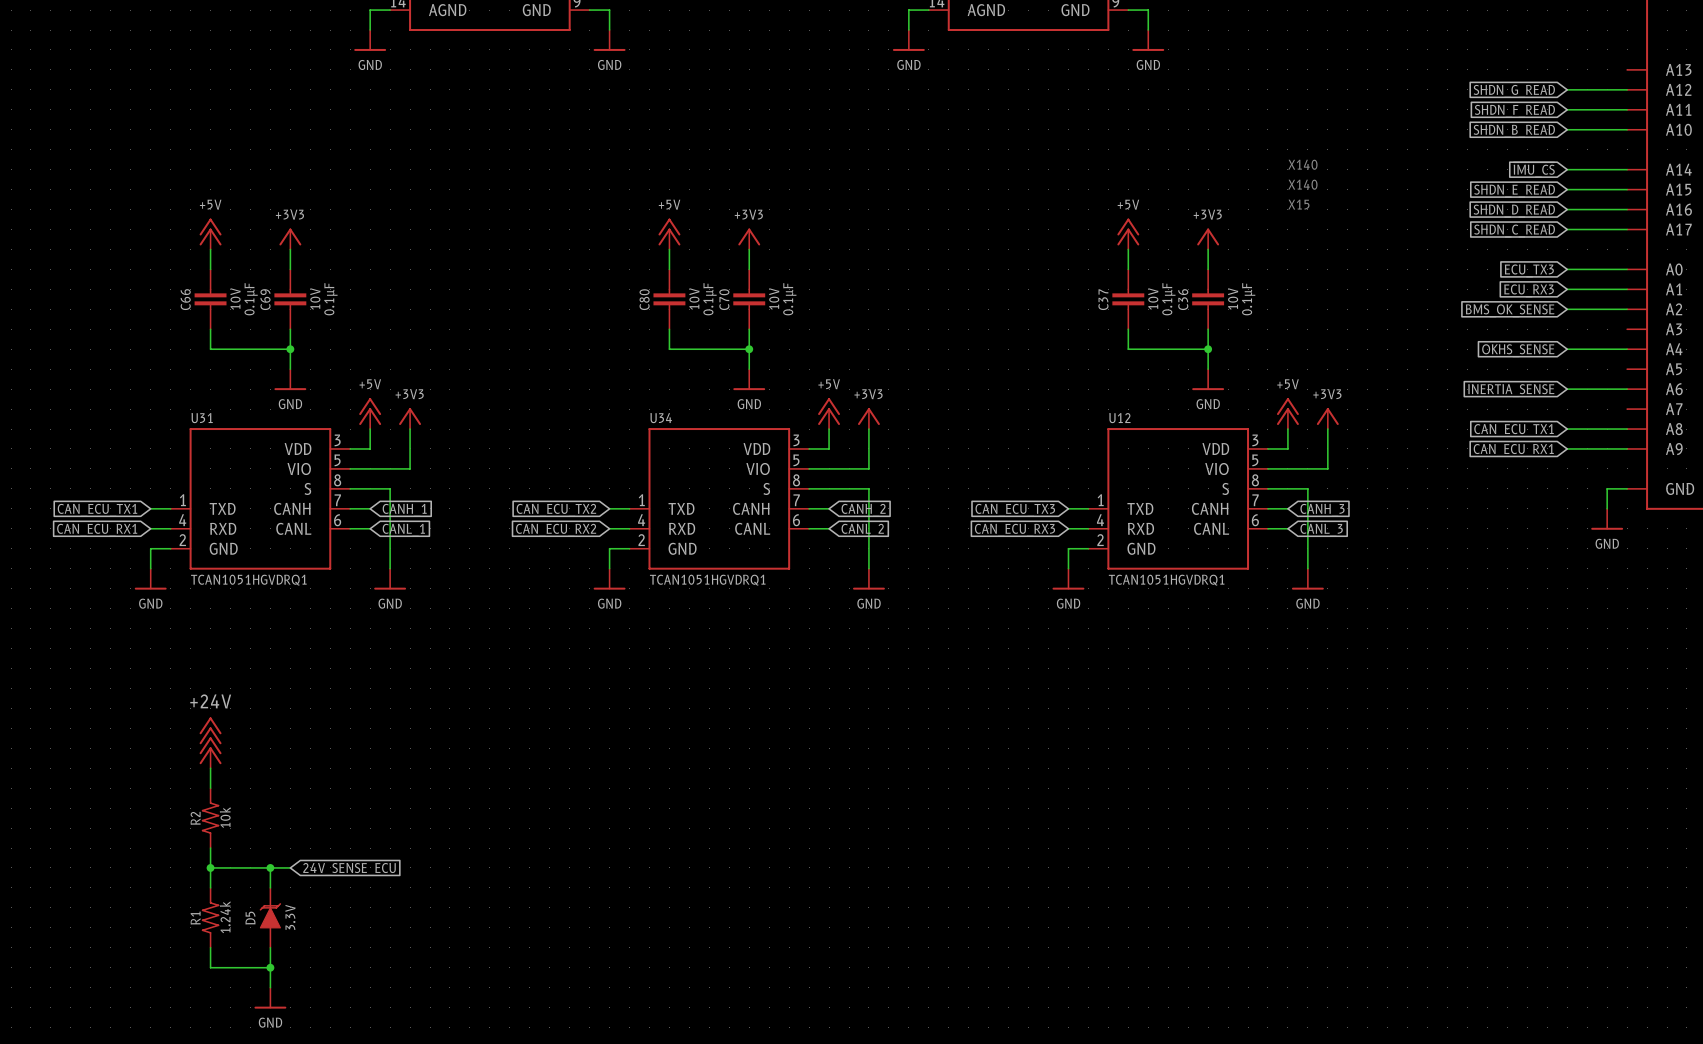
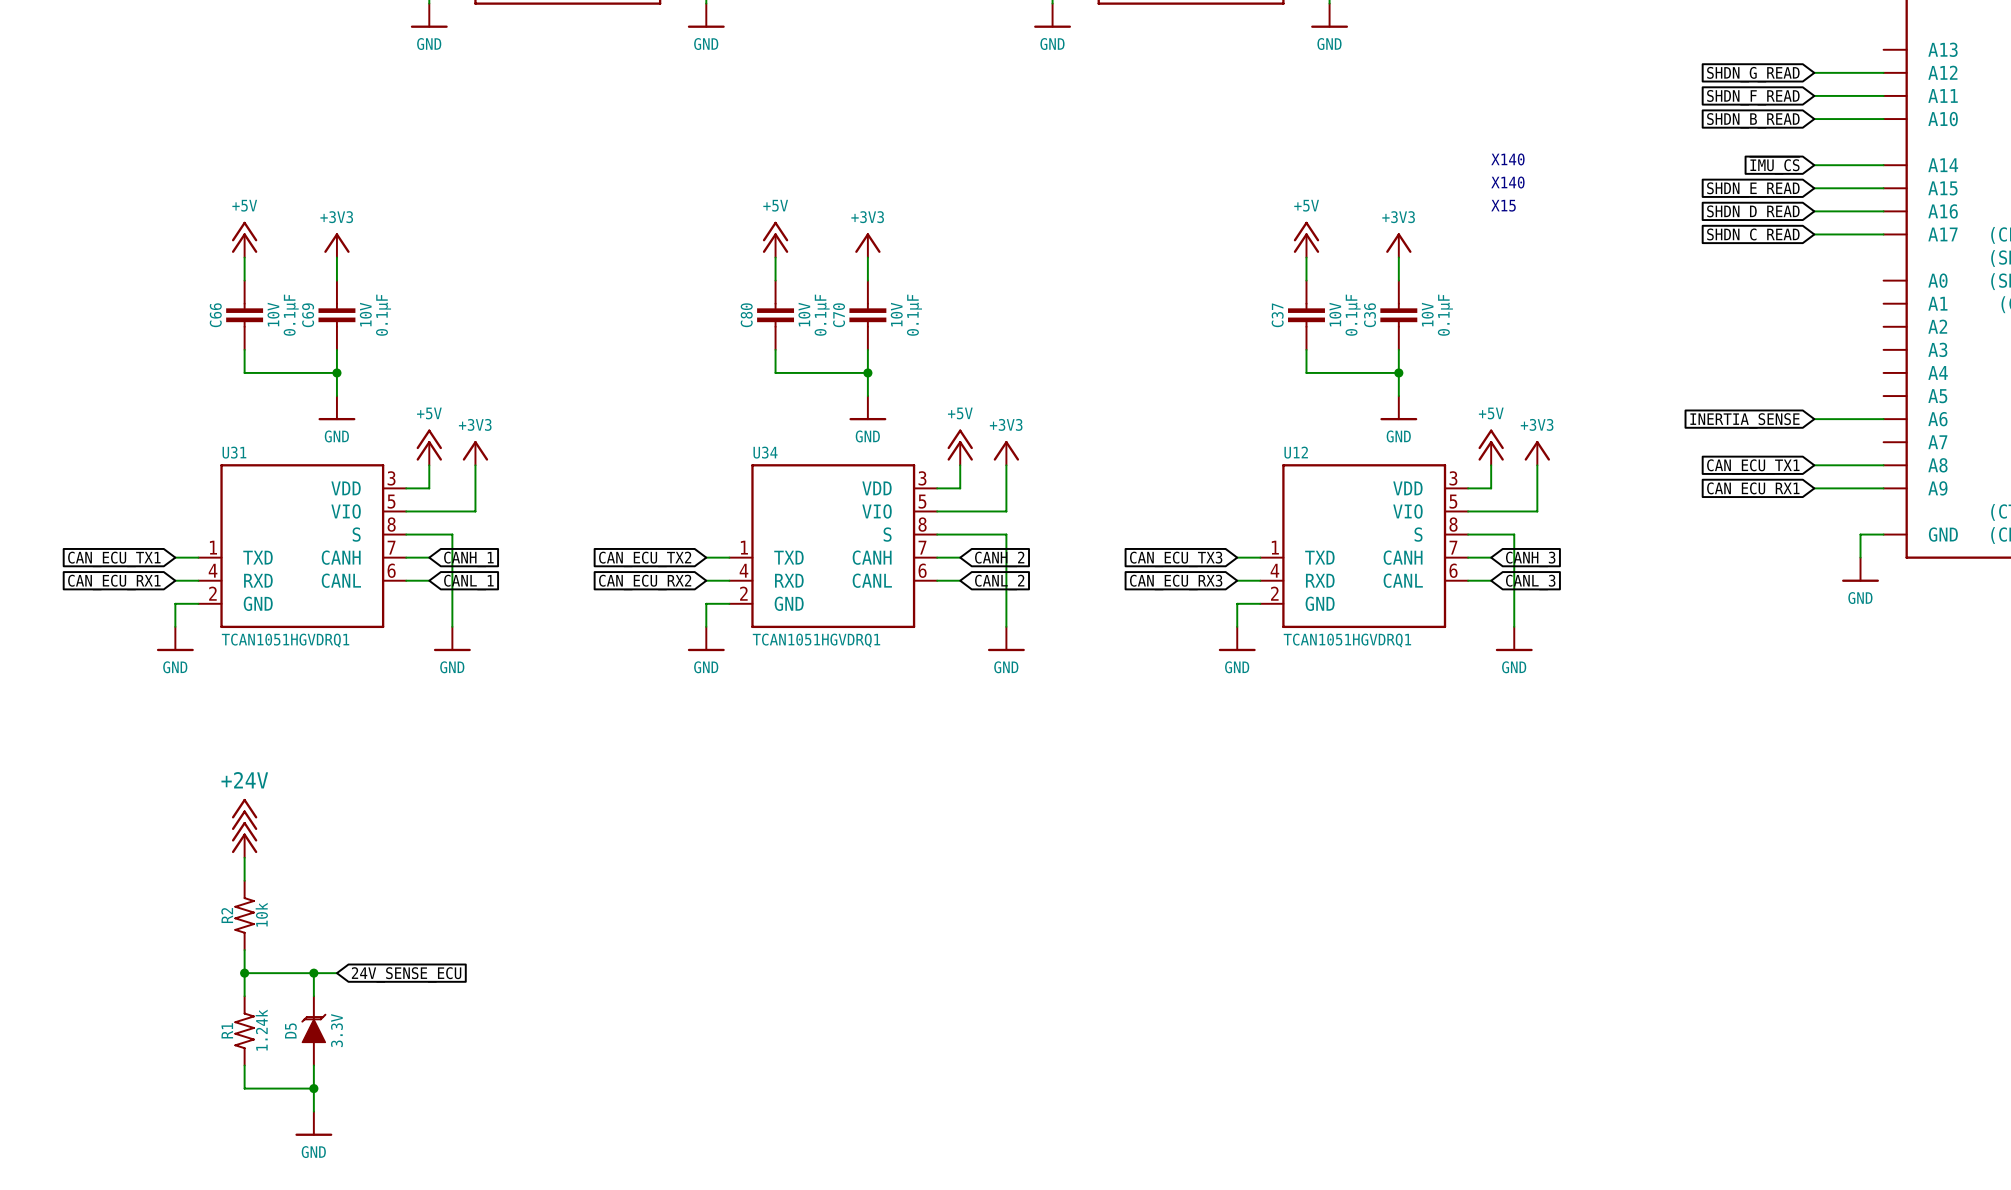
wire: (1567, 269) (1627, 269) -> none
global label: ECU_TX3 (1529, 270) -> none
wire: (1567, 289) (1627, 289) -> none
global label: ECU_RX3 (1529, 290) -> none
wire: (1567, 309) (1627, 309) -> none
global label: BMS_OK_SENSE (1510, 310) -> none
wire: (1567, 349) (1627, 349) -> none
global label: OKHS_SENSE (1518, 350) -> none

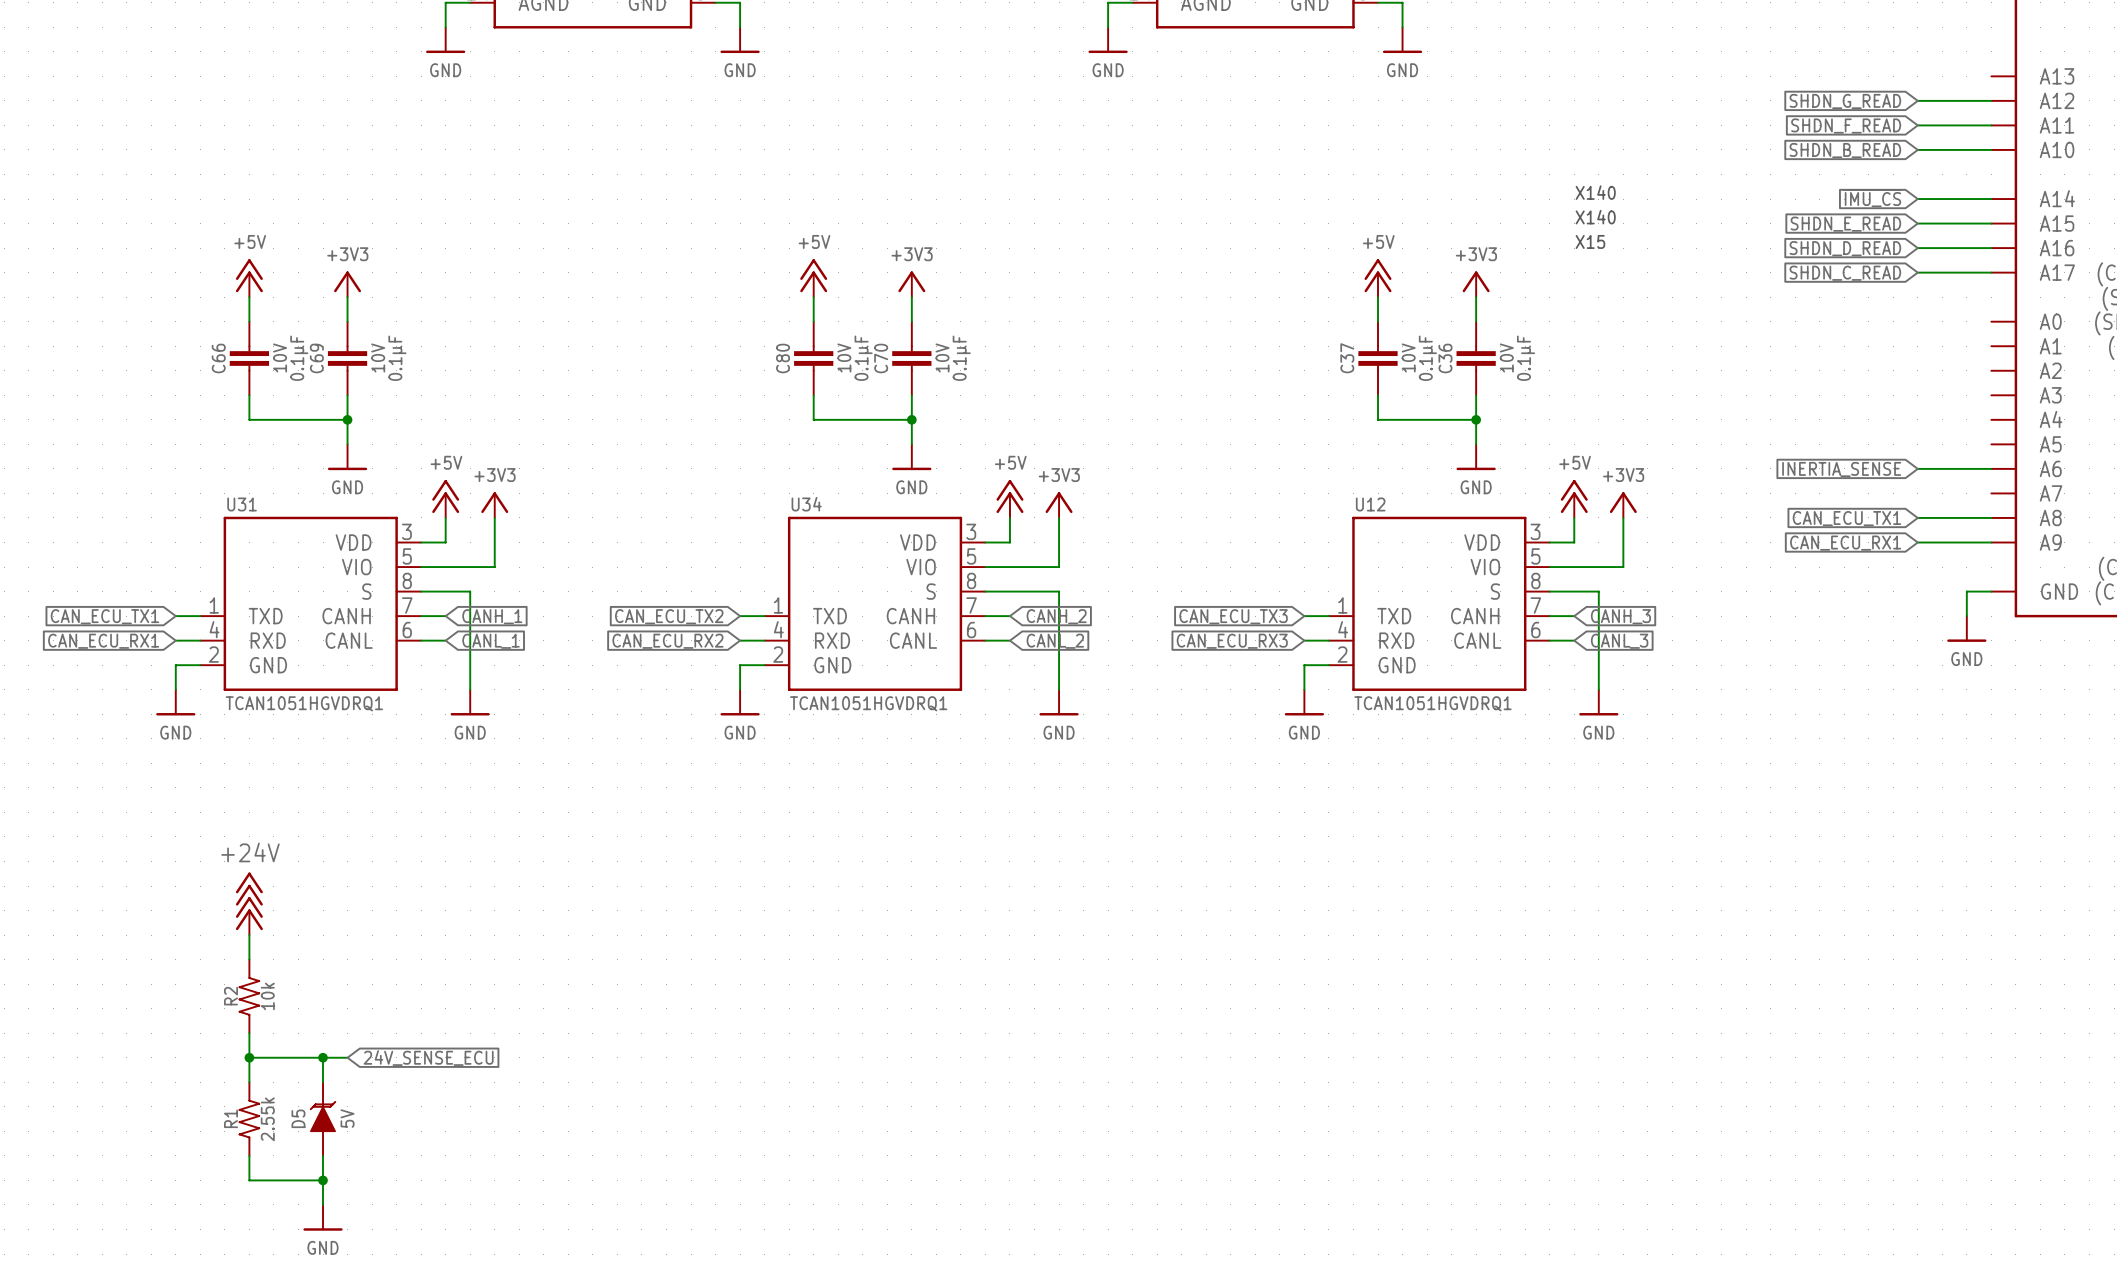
R1 text: 1.24k (261, 1030) -> 2.55k (267, 1119)
D5 text: 3.3V (336, 1030) -> 5V (347, 1118)

